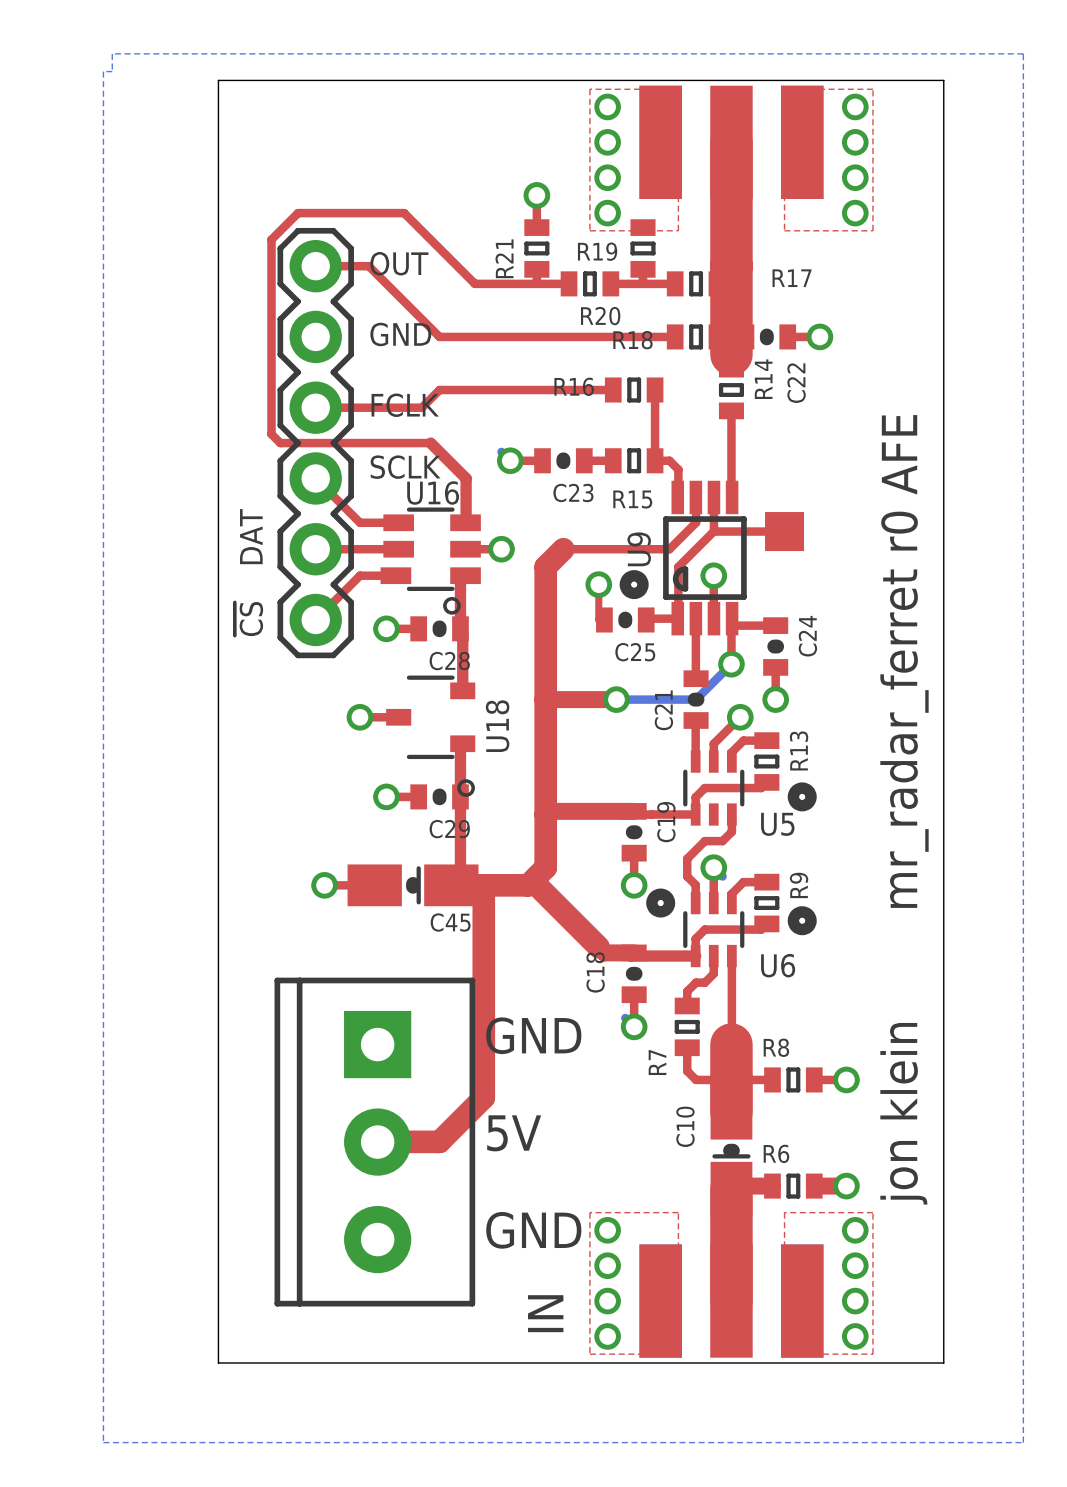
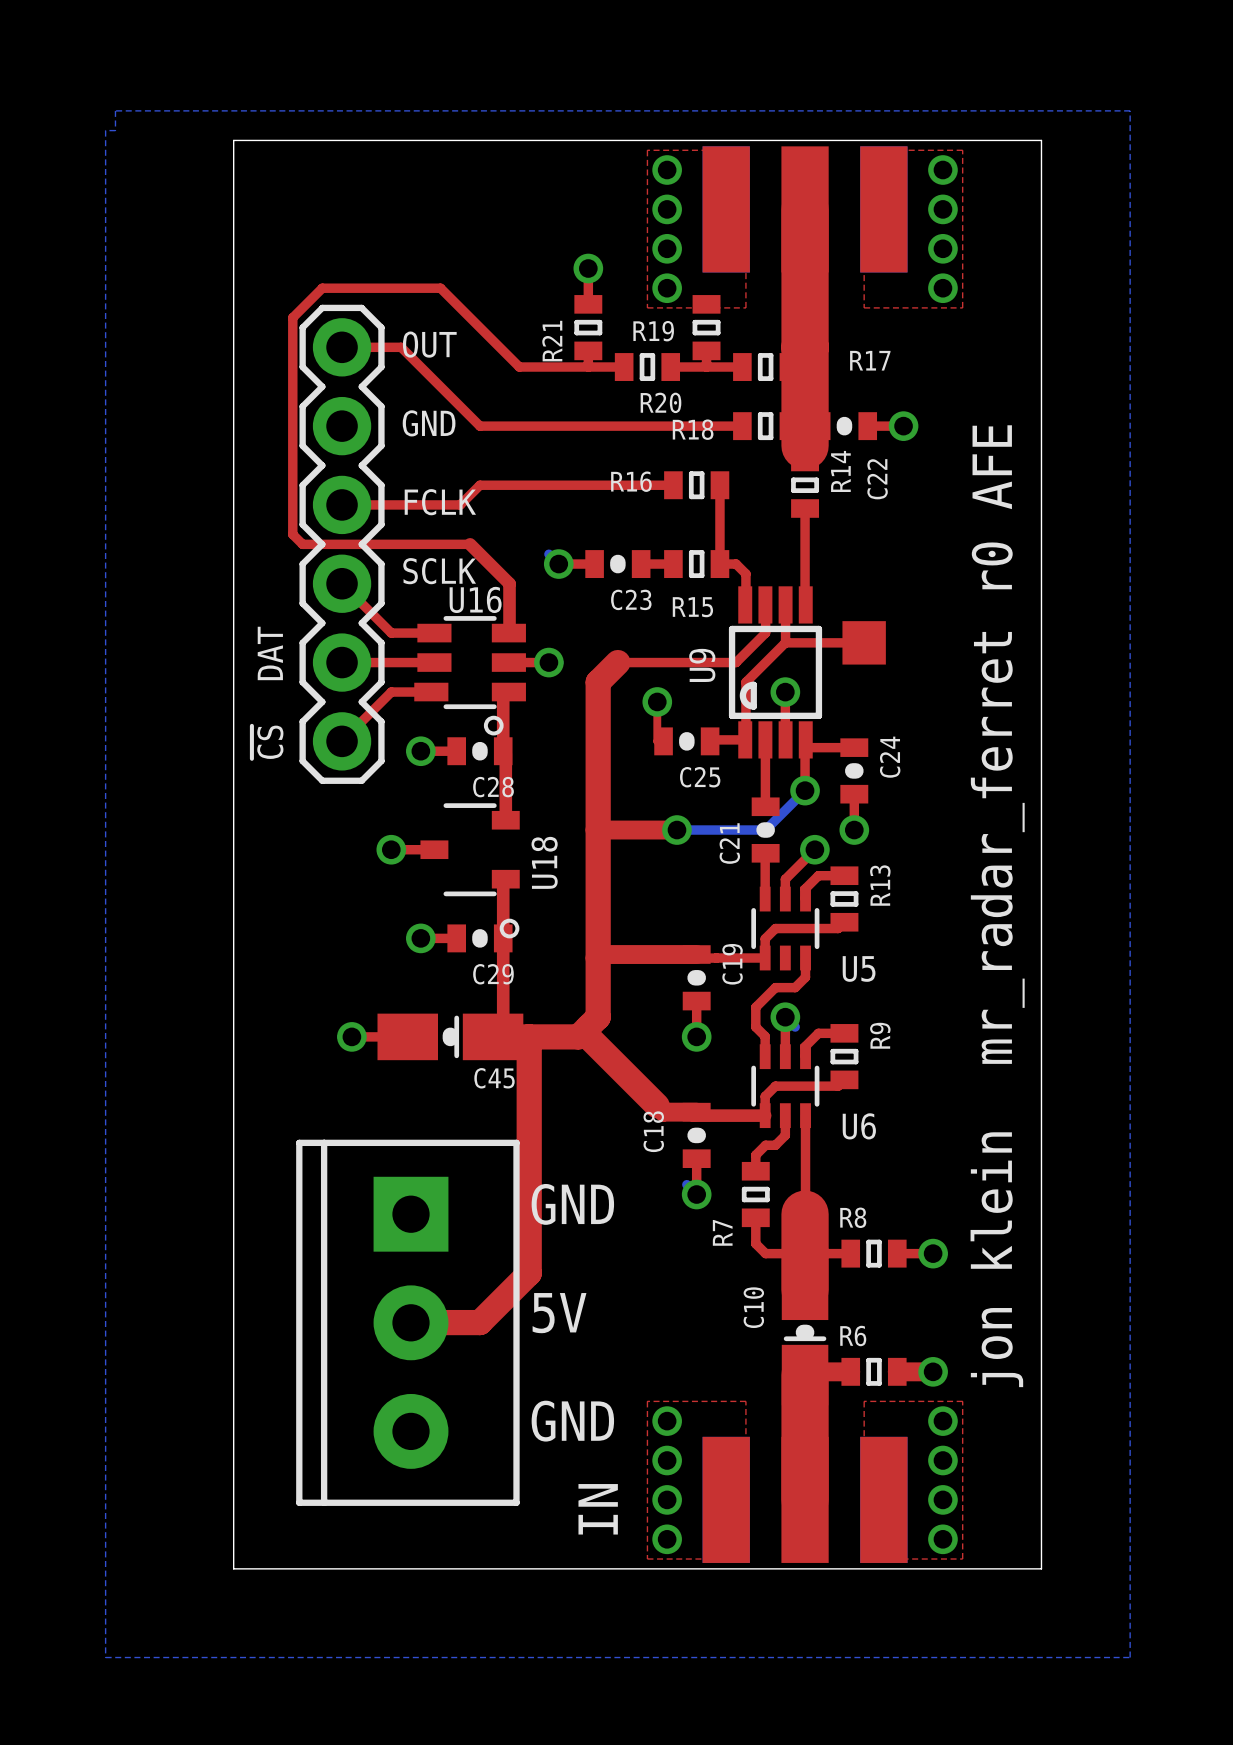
drawing: [619, 570, 649, 600] -> none
drawing: [787, 782, 817, 812] -> none
drawing: [646, 888, 676, 918] -> none
drawing: [787, 906, 817, 936] -> none

